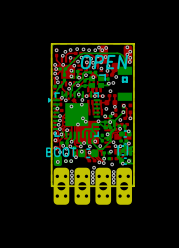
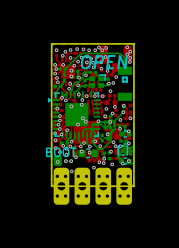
via: (93, 77) -> none
via: (113, 171) -> none
via: (92, 172) -> none
via: (71, 175) -> none
via: (92, 175) -> none
via: (113, 175) -> none
via: (71, 179) -> none
via: (92, 179) -> none
via: (113, 179) -> none
via: (71, 182) -> none
via: (92, 182) -> none
via: (113, 182) -> none

